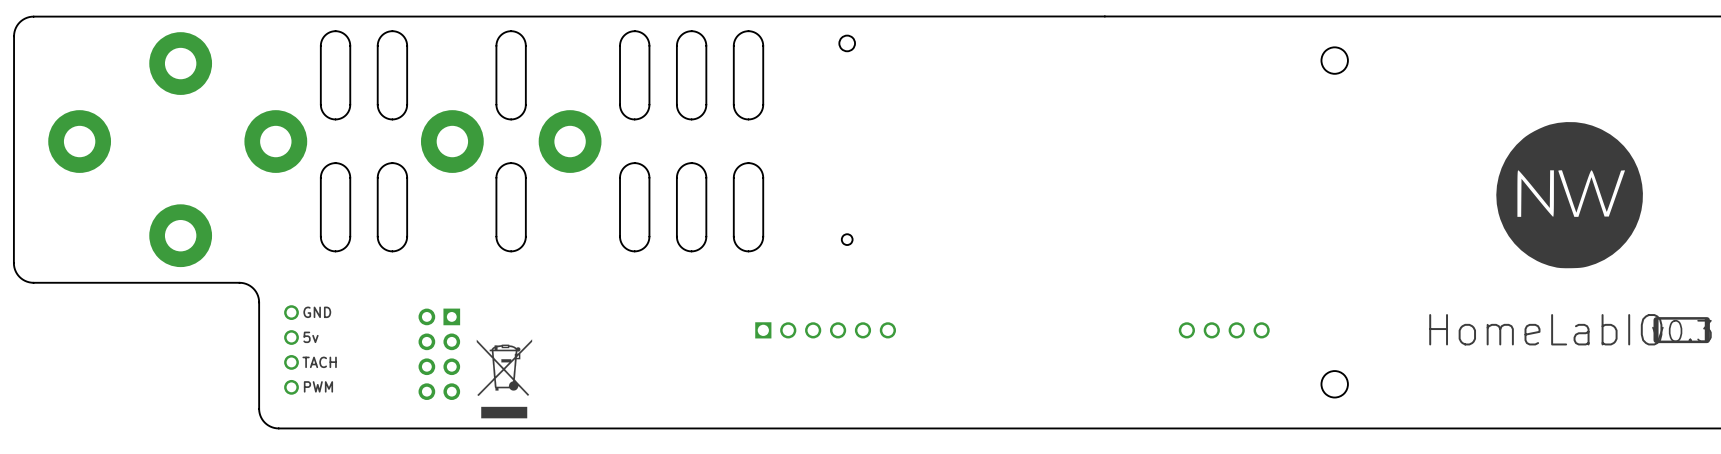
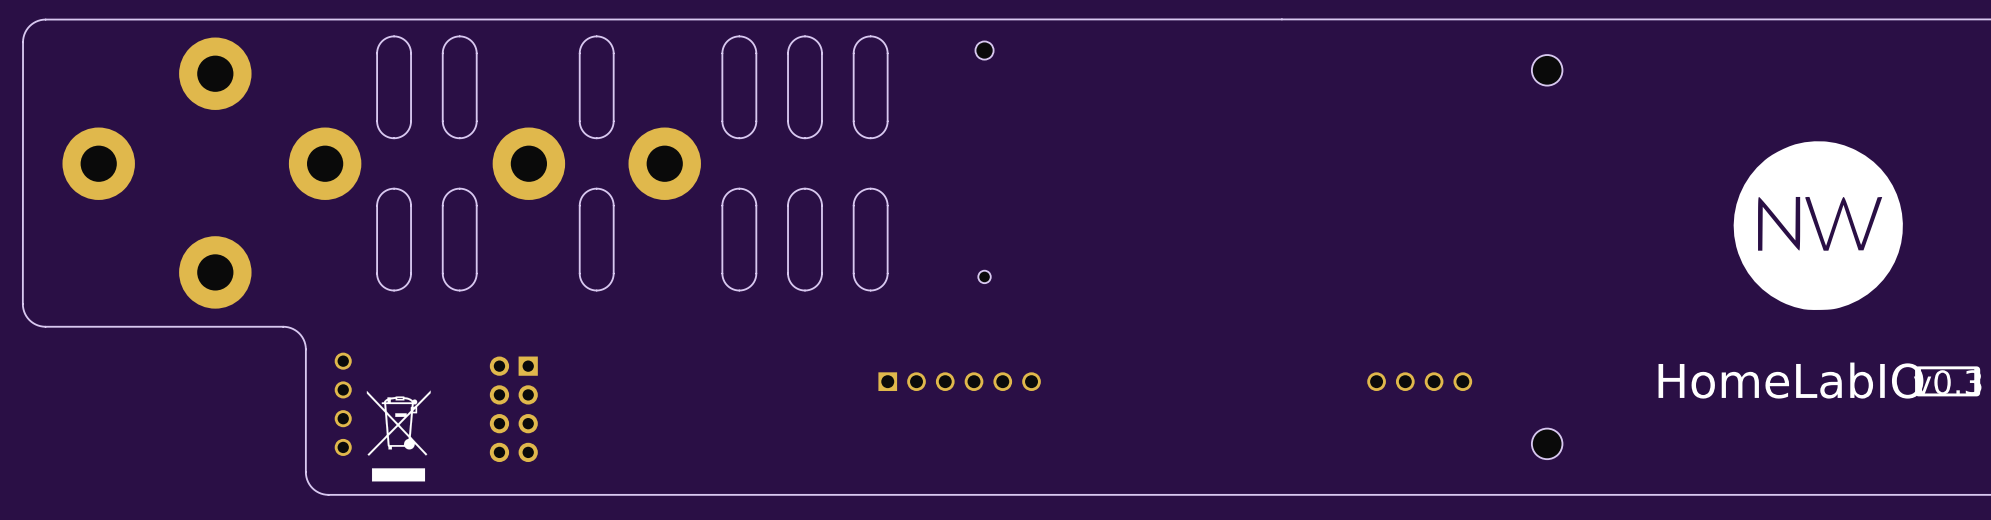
text: GND (317, 312) -> none
text: 5v (310, 337) -> none
text: TACH (319, 362) -> none
drawing position: (504, 378) -> (398, 435)
text: PWM (318, 386) -> none

